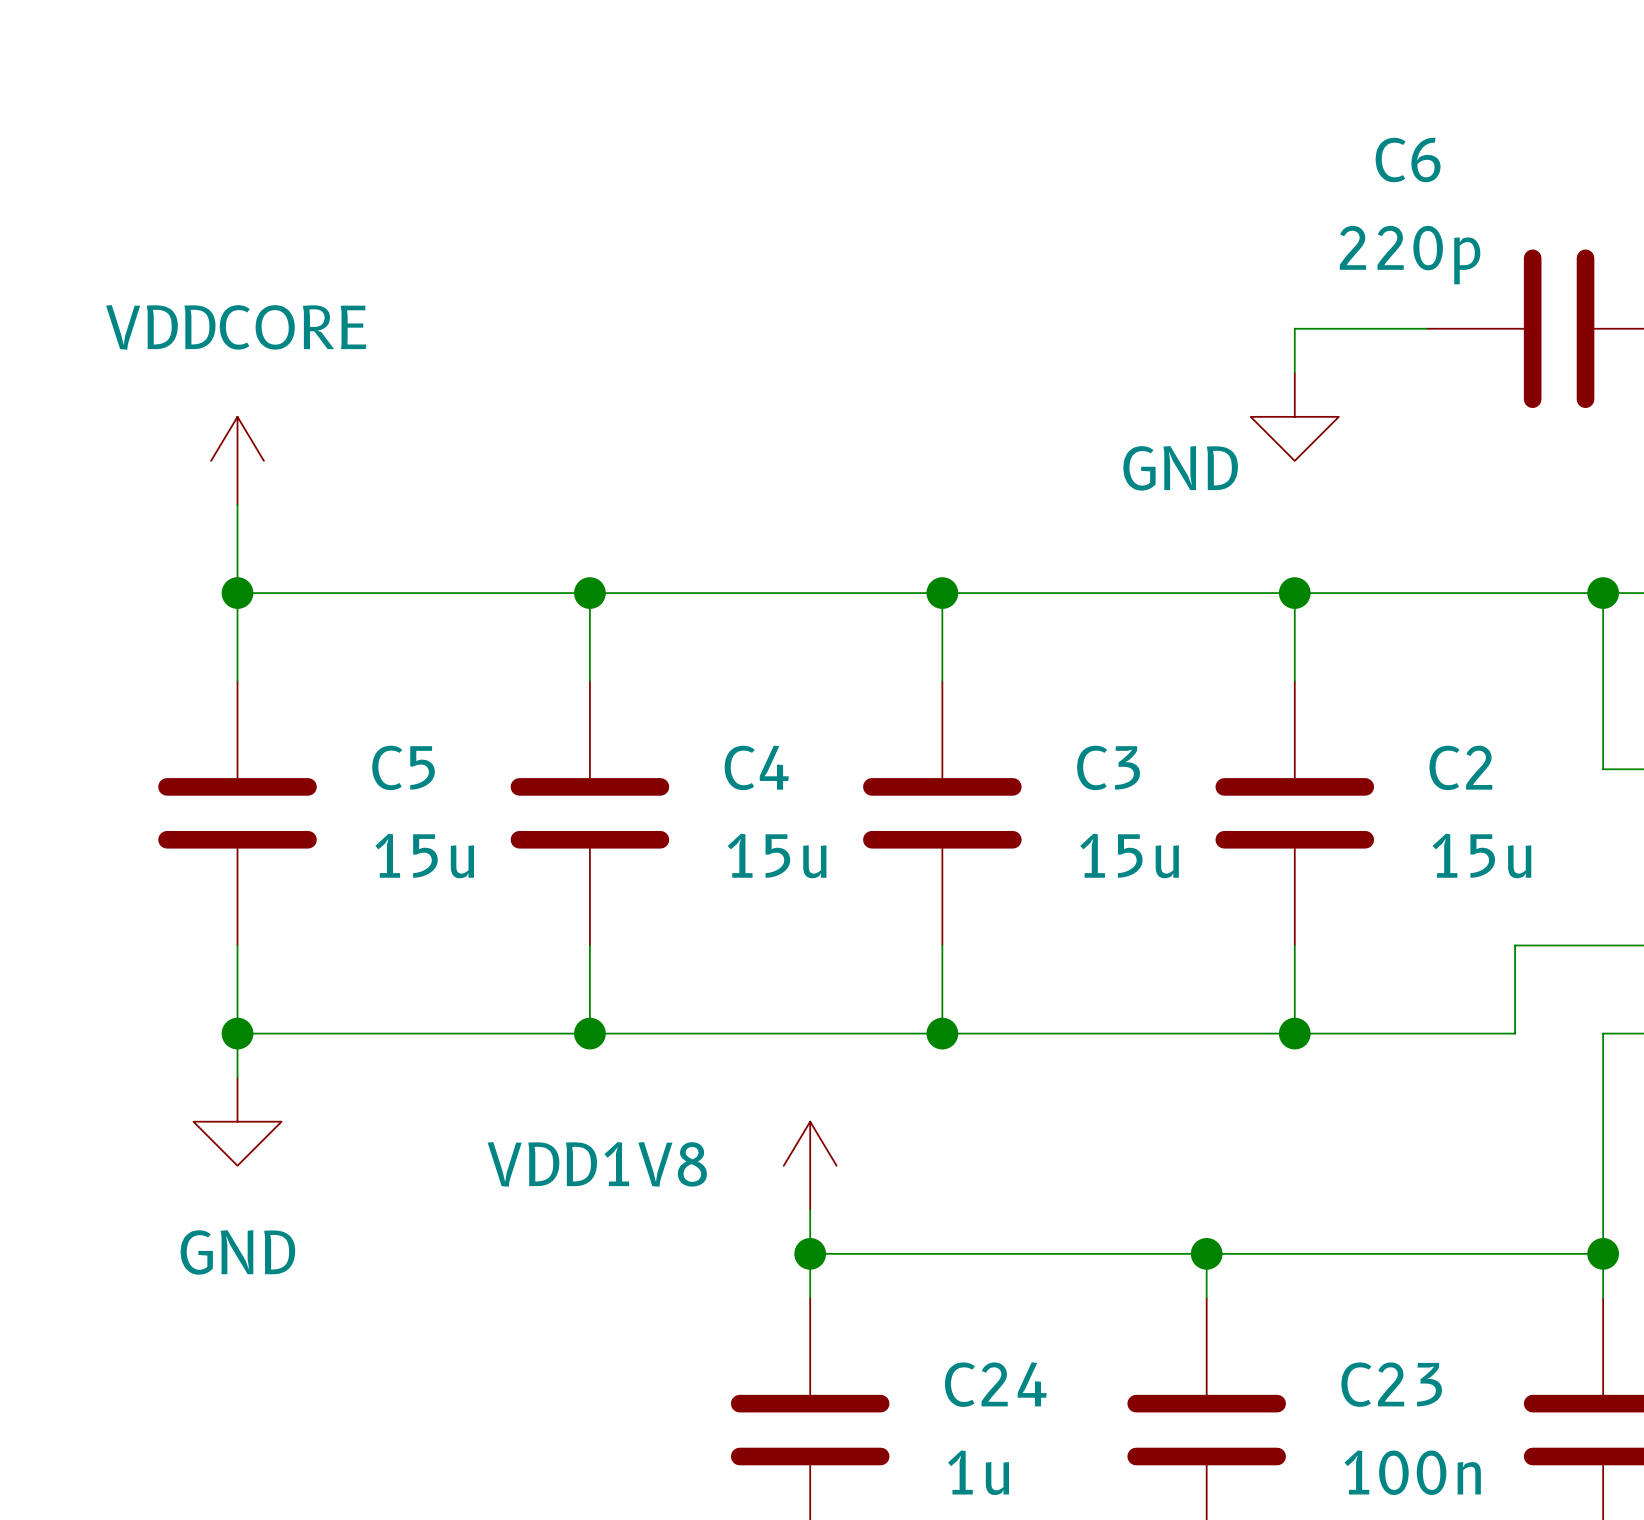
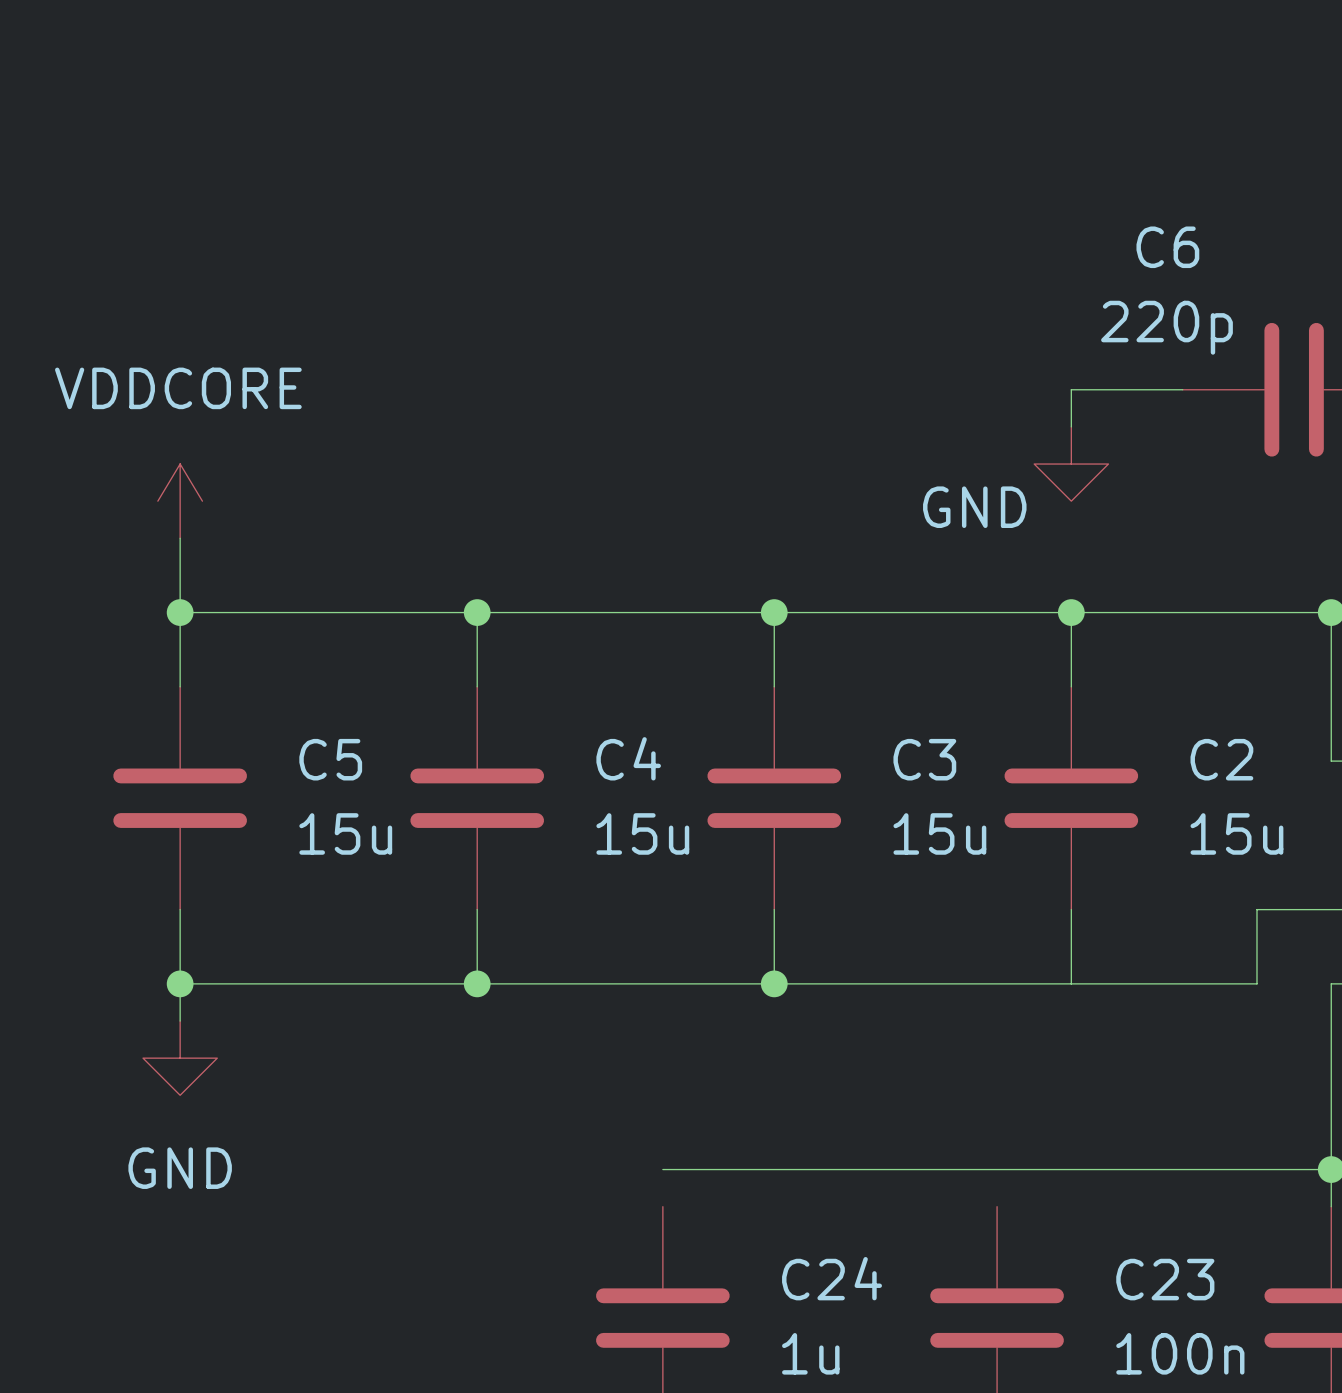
junction: (1294, 1033) -> none
power symbol: VDD1V8 (810, 1165) -> none
wire: (810, 1209) (810, 1297) -> none
junction: (810, 1253) -> none
wire: (1206, 1253) (1206, 1297) -> none
junction: (1206, 1253) -> none

